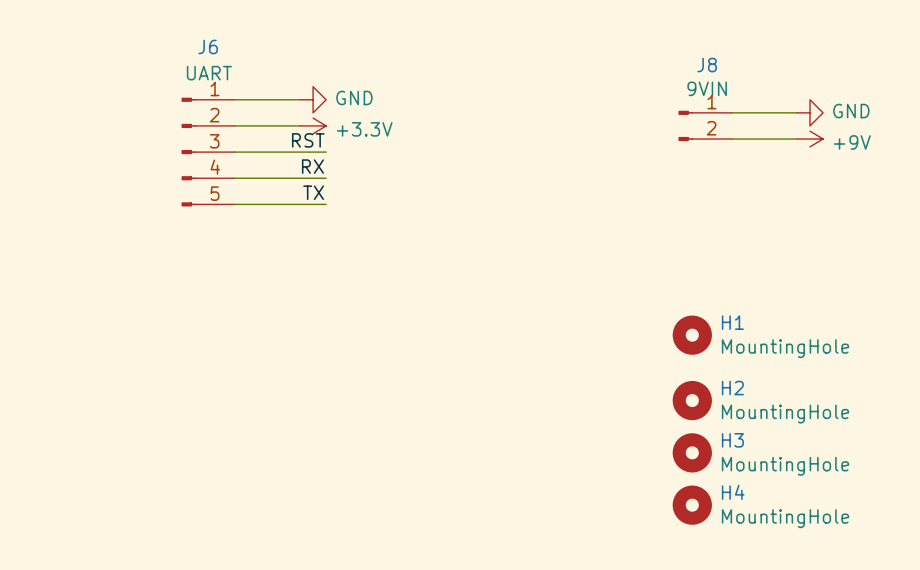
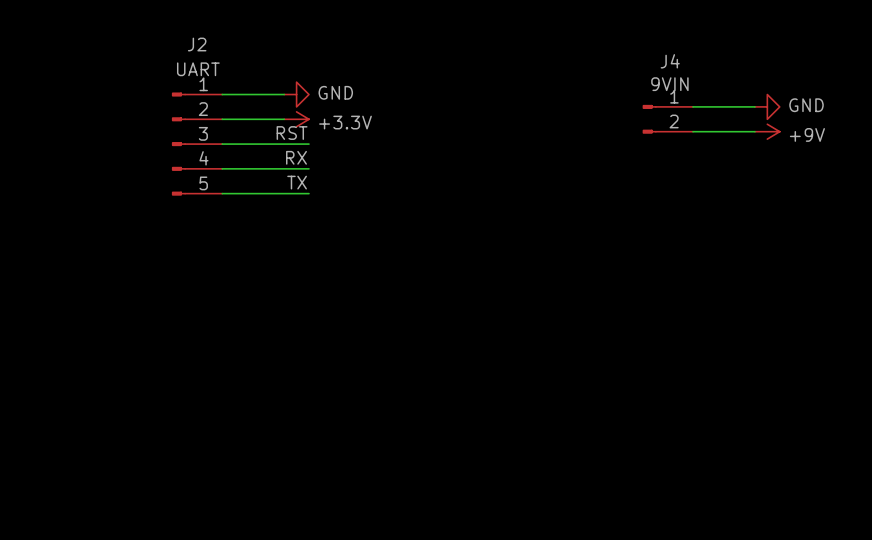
J6 name: J6 (208, 46) -> J2 (197, 44)
J8 name: J8 (707, 65) -> J4 (670, 61)
H1: MountingHole (692, 335) -> none
H2: MountingHole (692, 400) -> none
H3: MountingHole (692, 452) -> none
H4: MountingHole (692, 505) -> none

